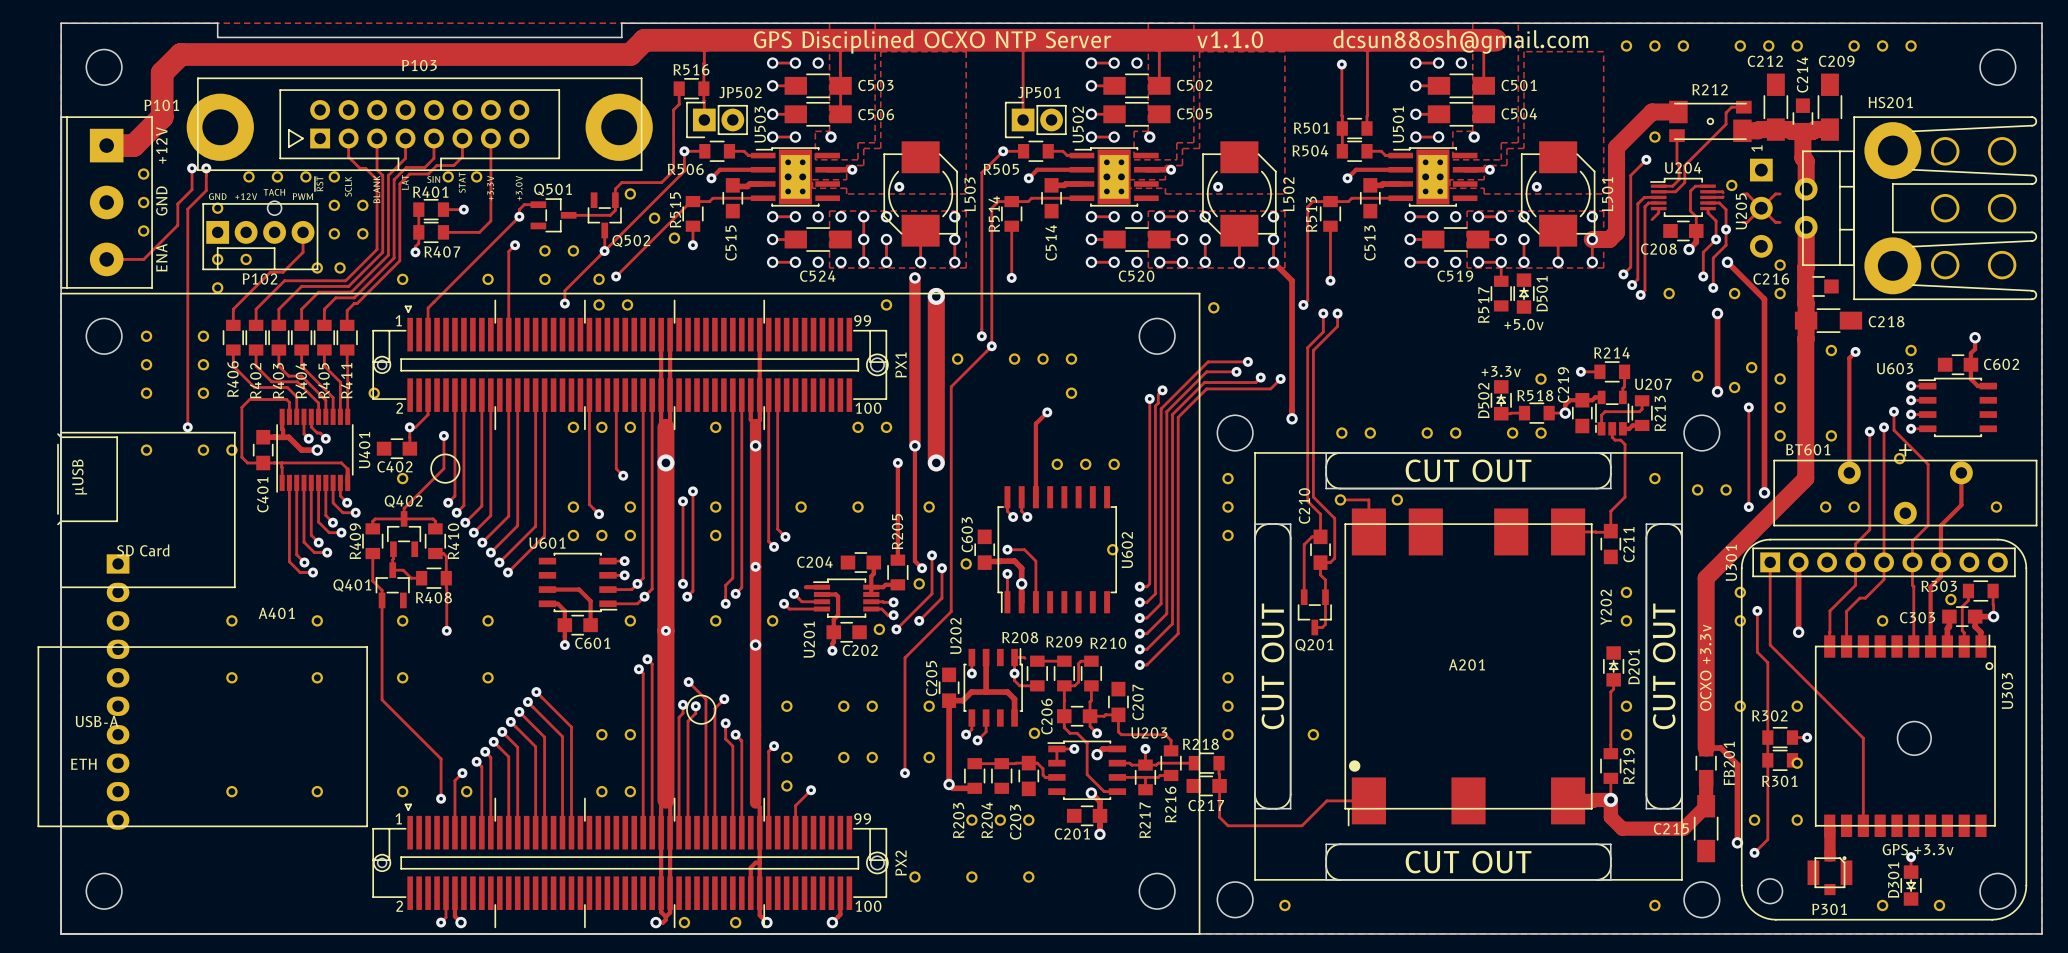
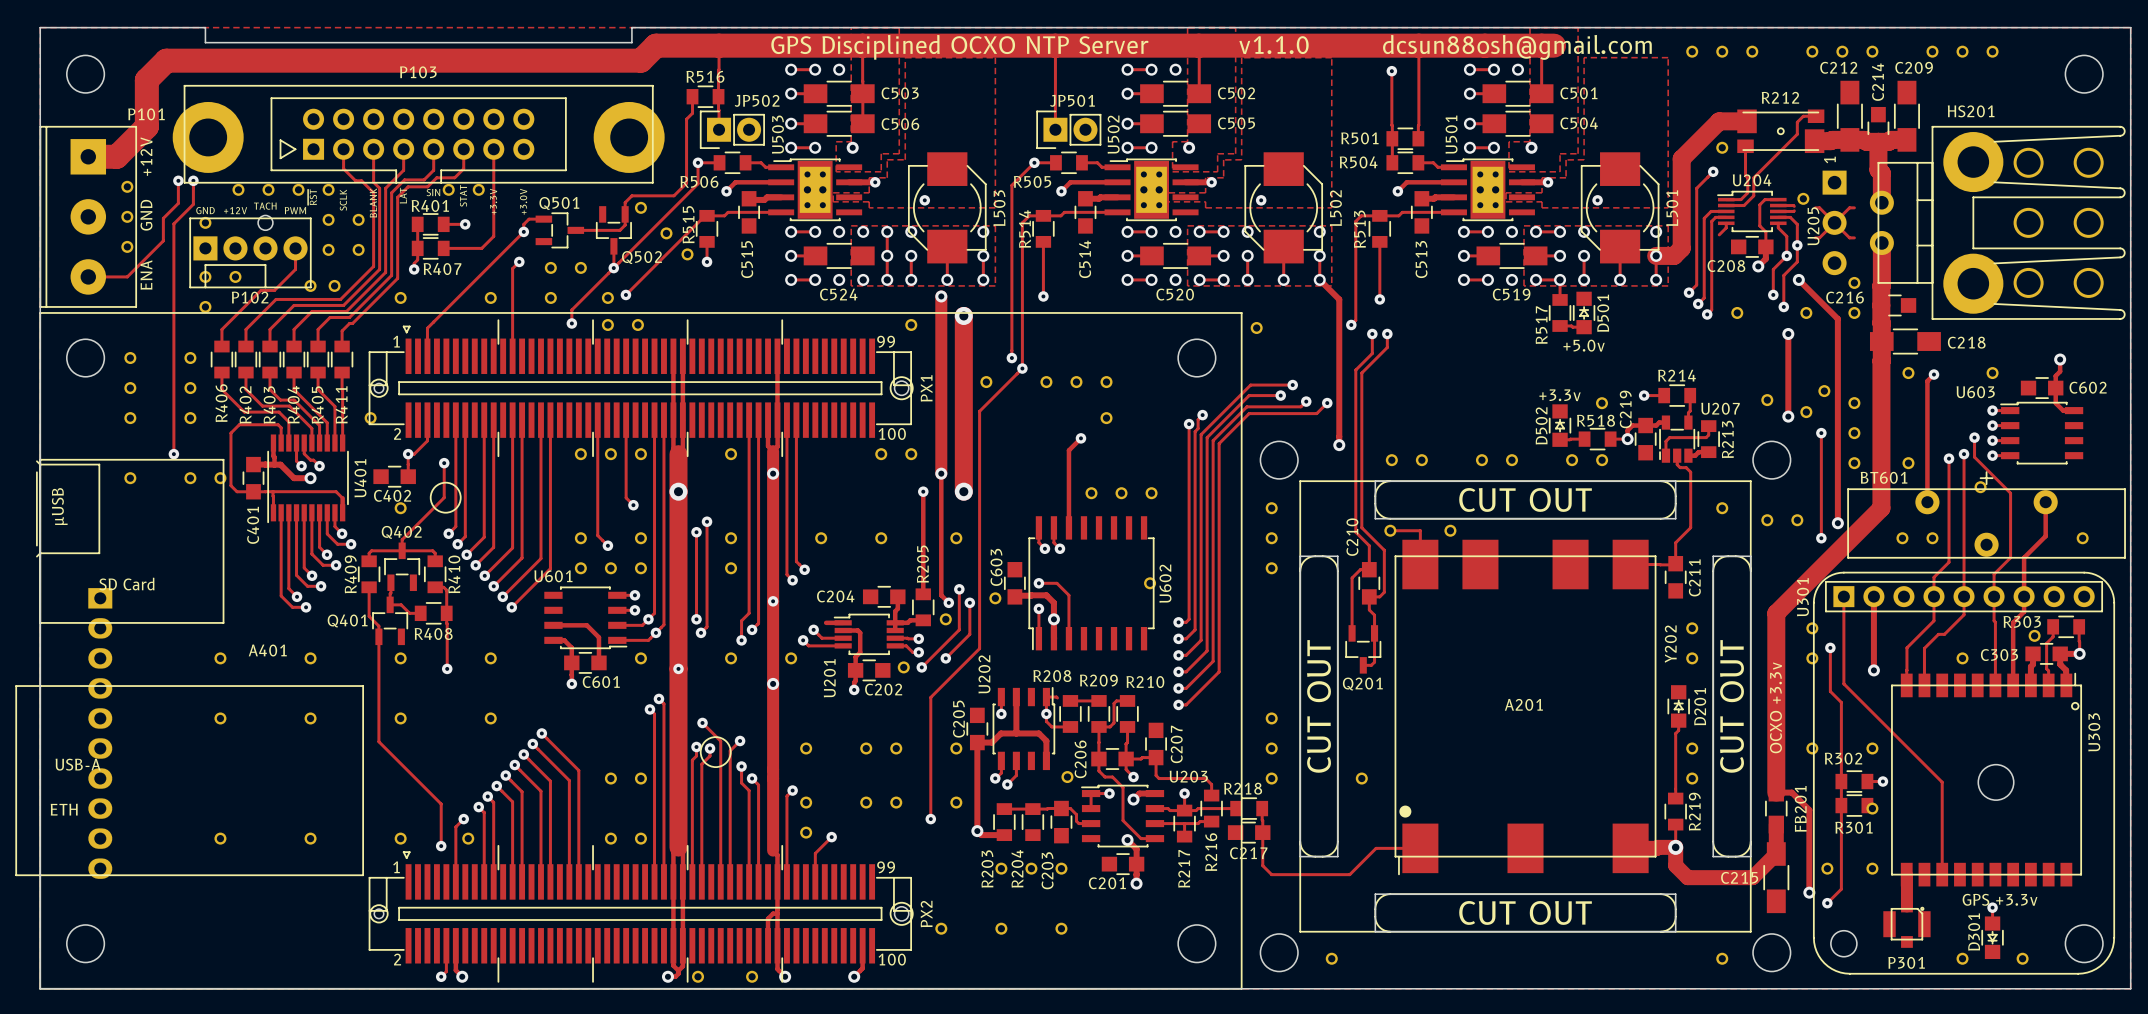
track: none -> (1560, 325) (1584, 327)

